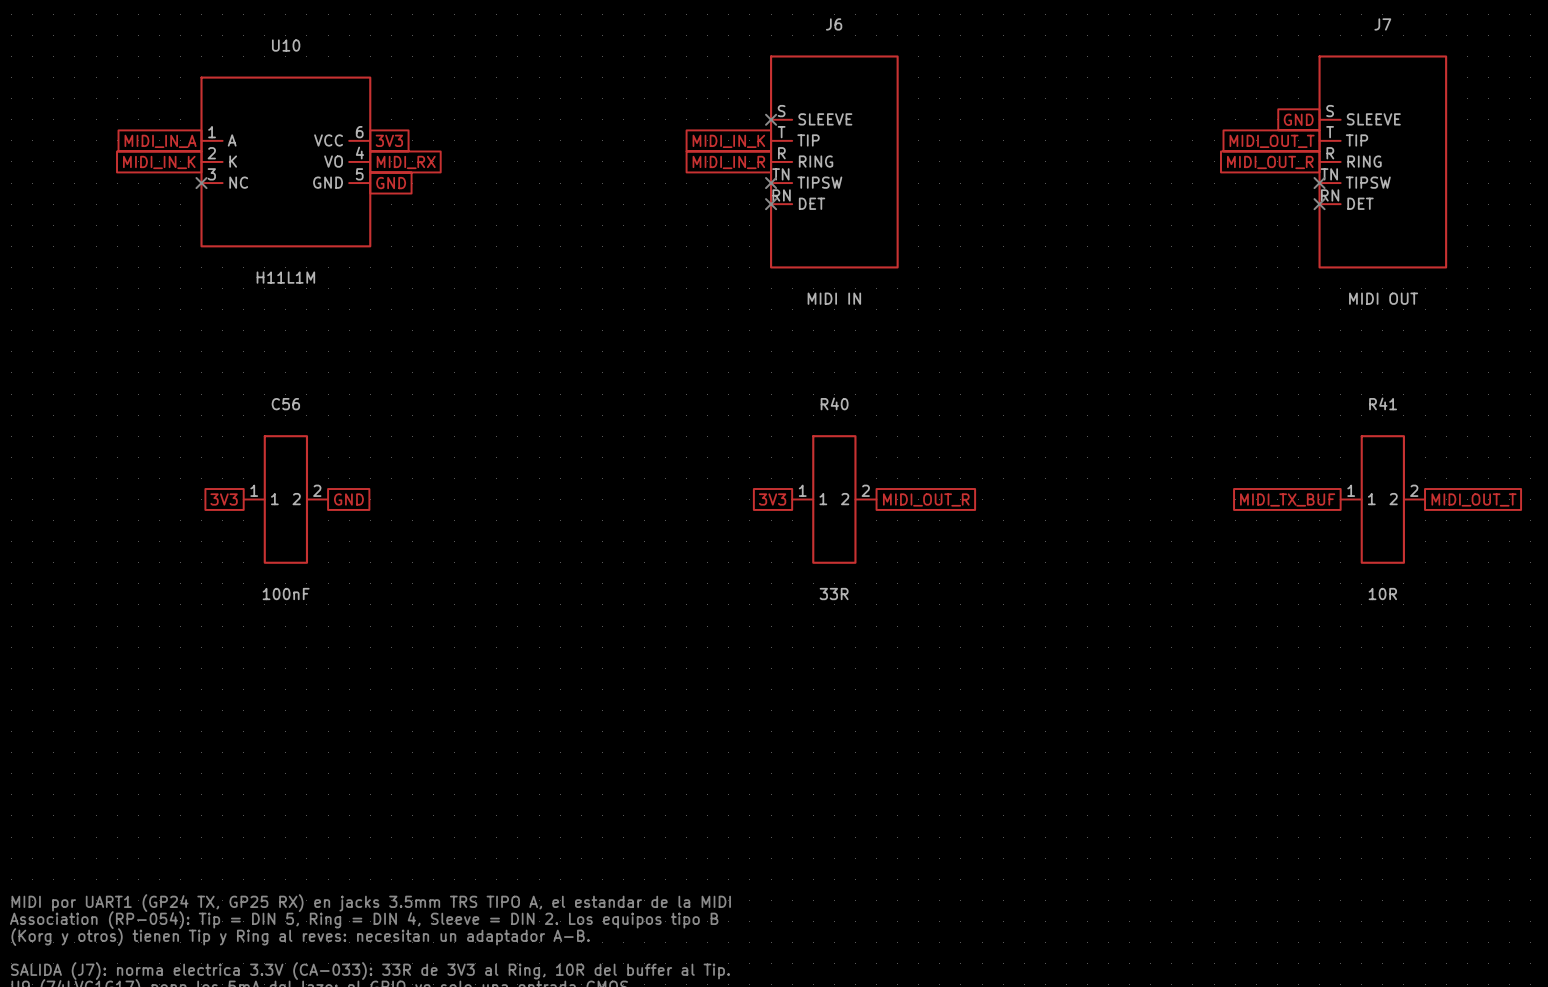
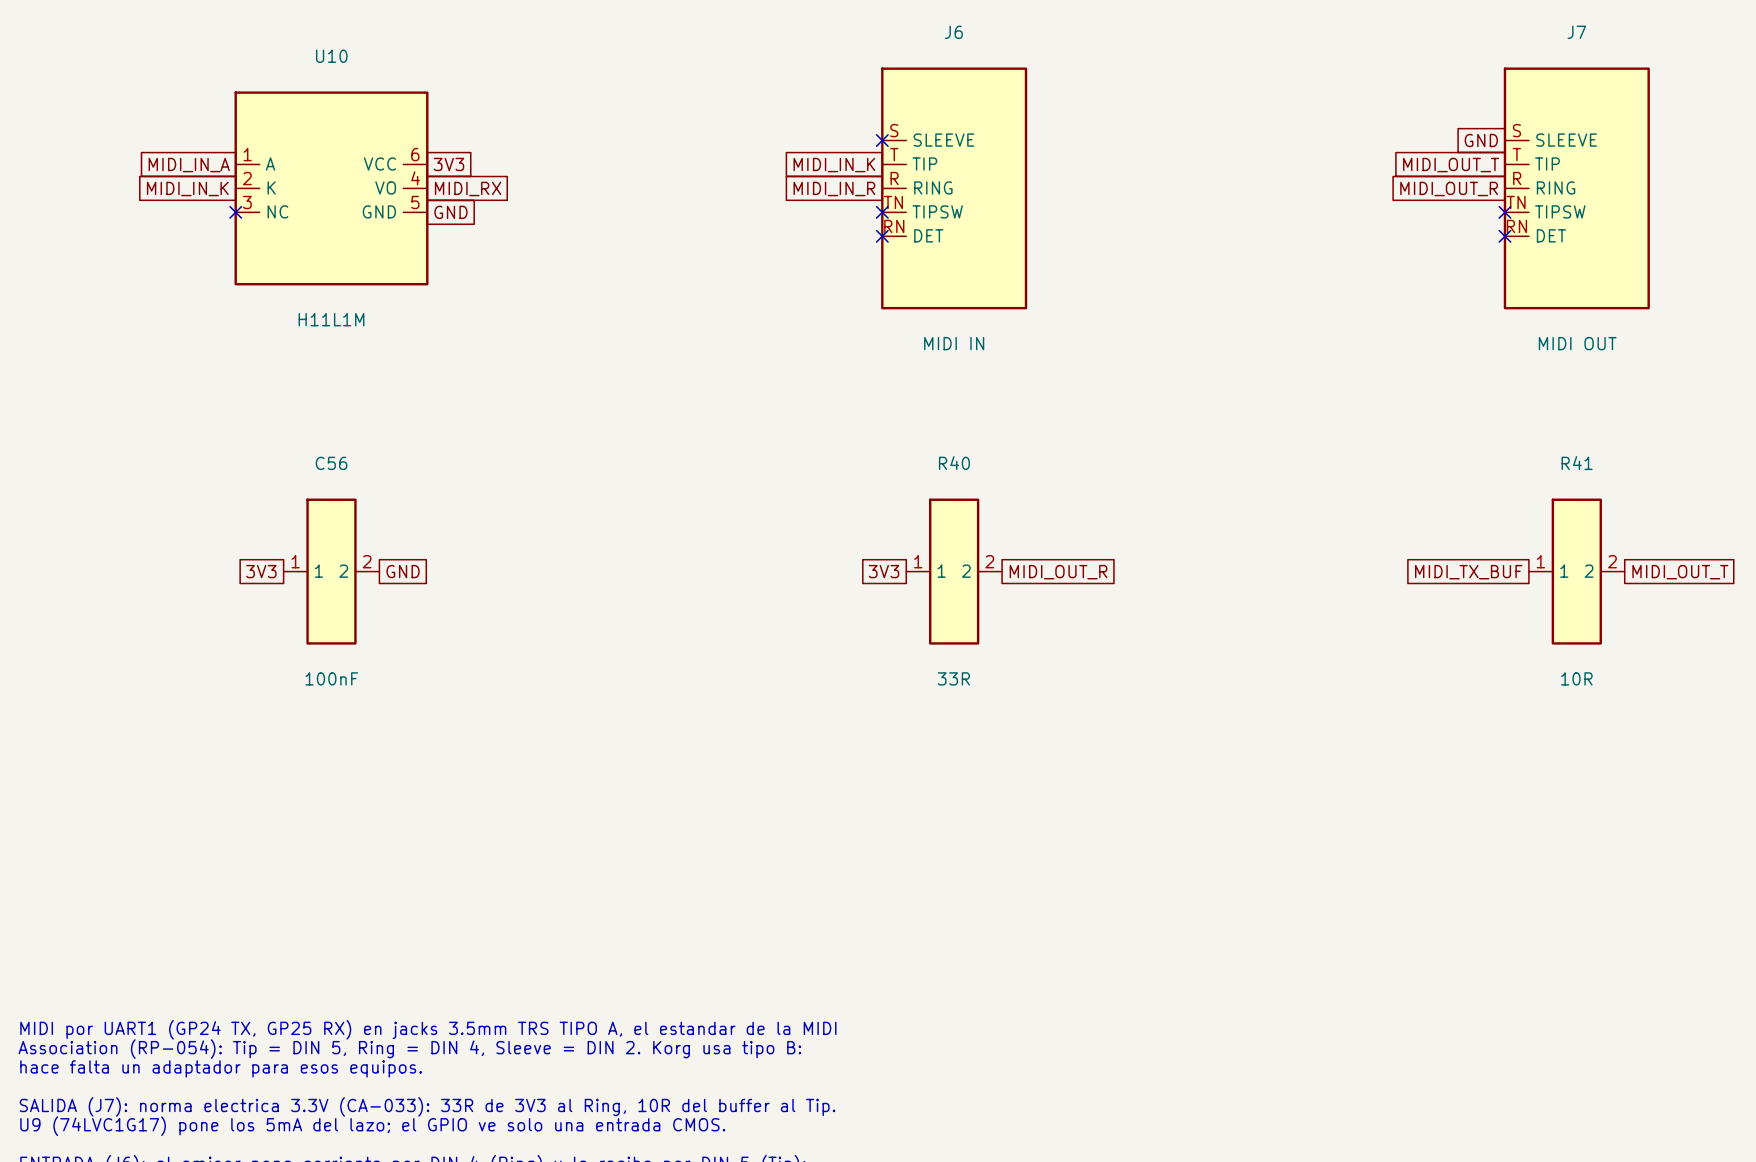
text: Association (RP-054): Tip = DIN 5, Ring = DIN 4, Sleeve = DIN 2. Los equipos tipo B (364, 920) -> Association (RP-054): Tip = DIN 5, Ring = DIN 4, Sleeve = DIN 2. Korg usa tipo B: (409, 1049)
text: (Korg y otros) tienen Tip y Ring al reves: necesitan un adaptador A-B. (300, 937) -> hace falta un adaptador para esos equipos. (221, 1068)

